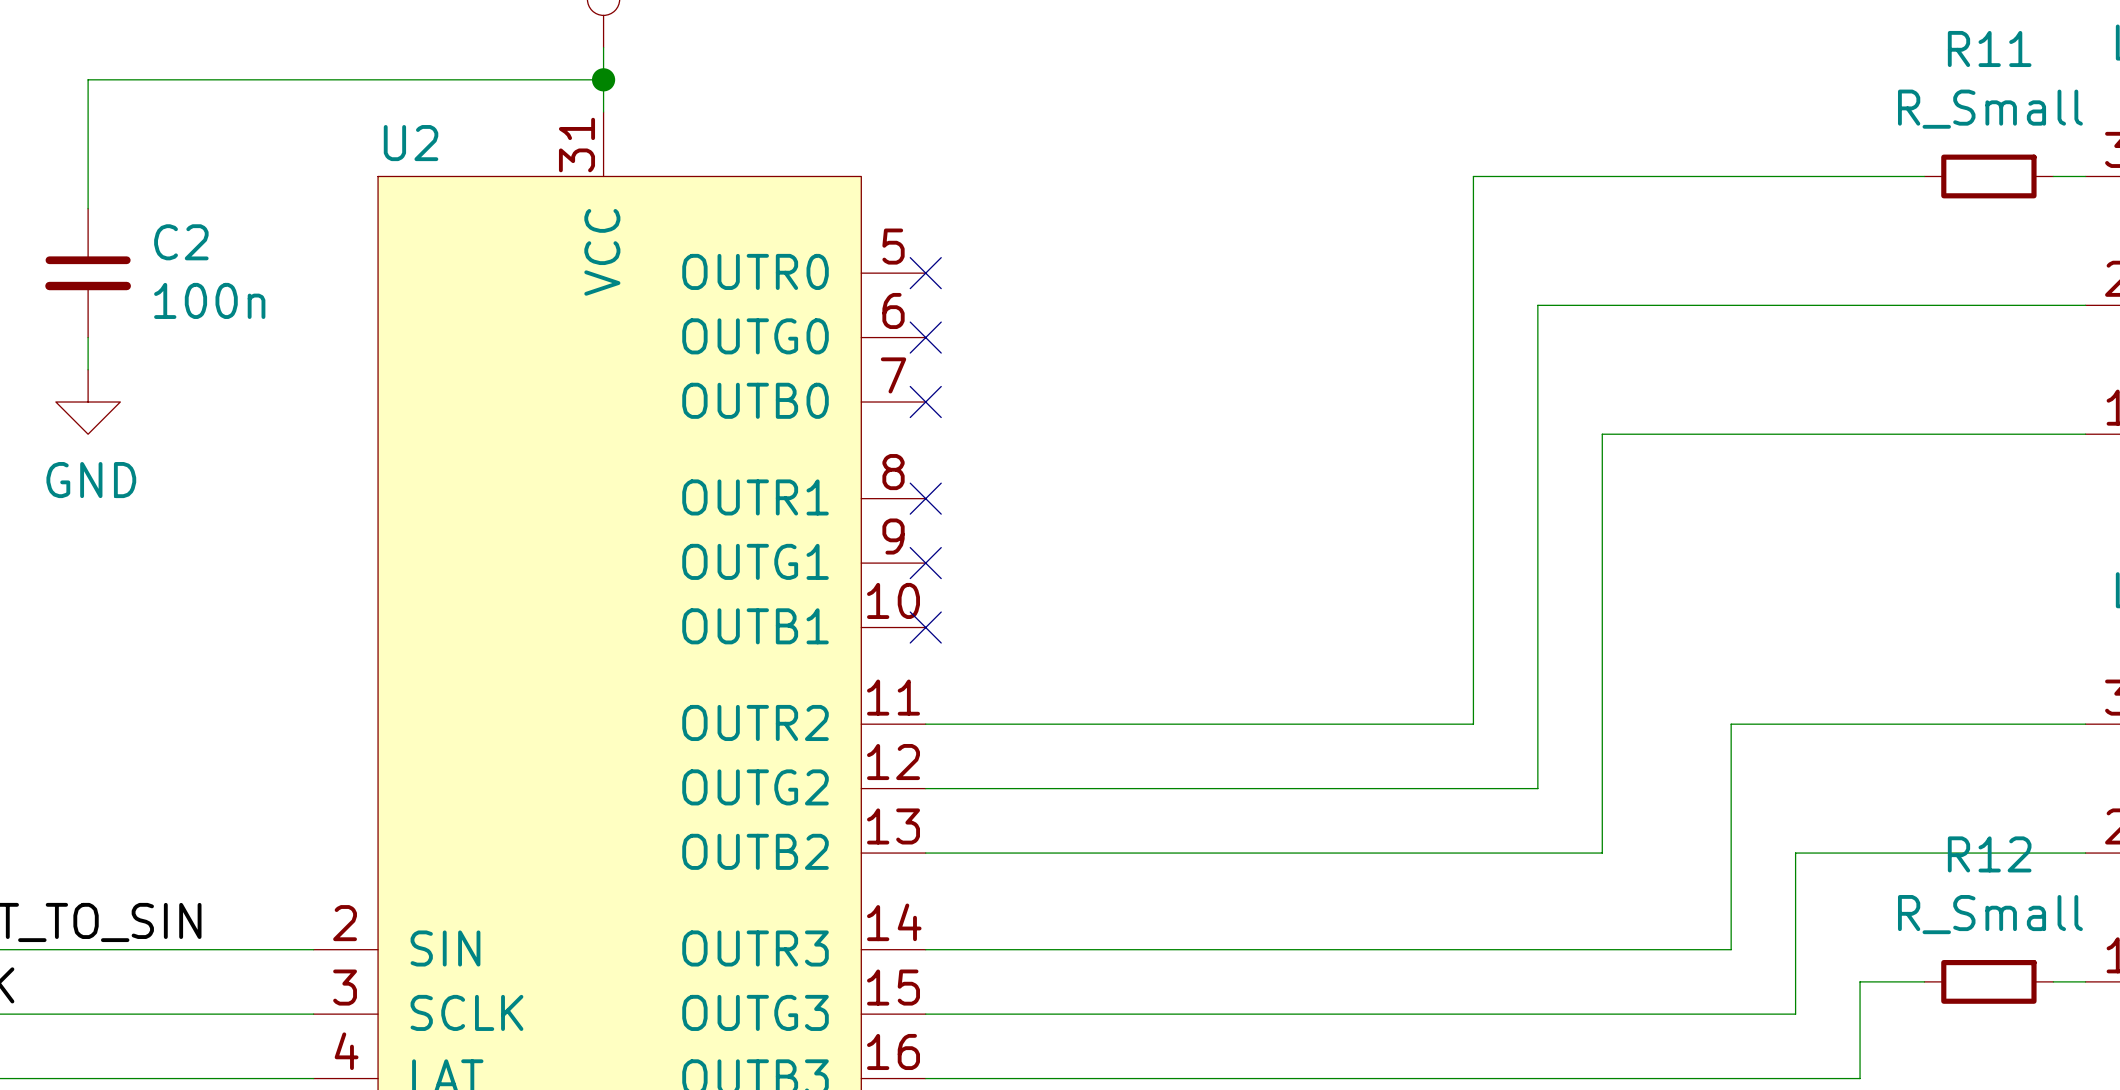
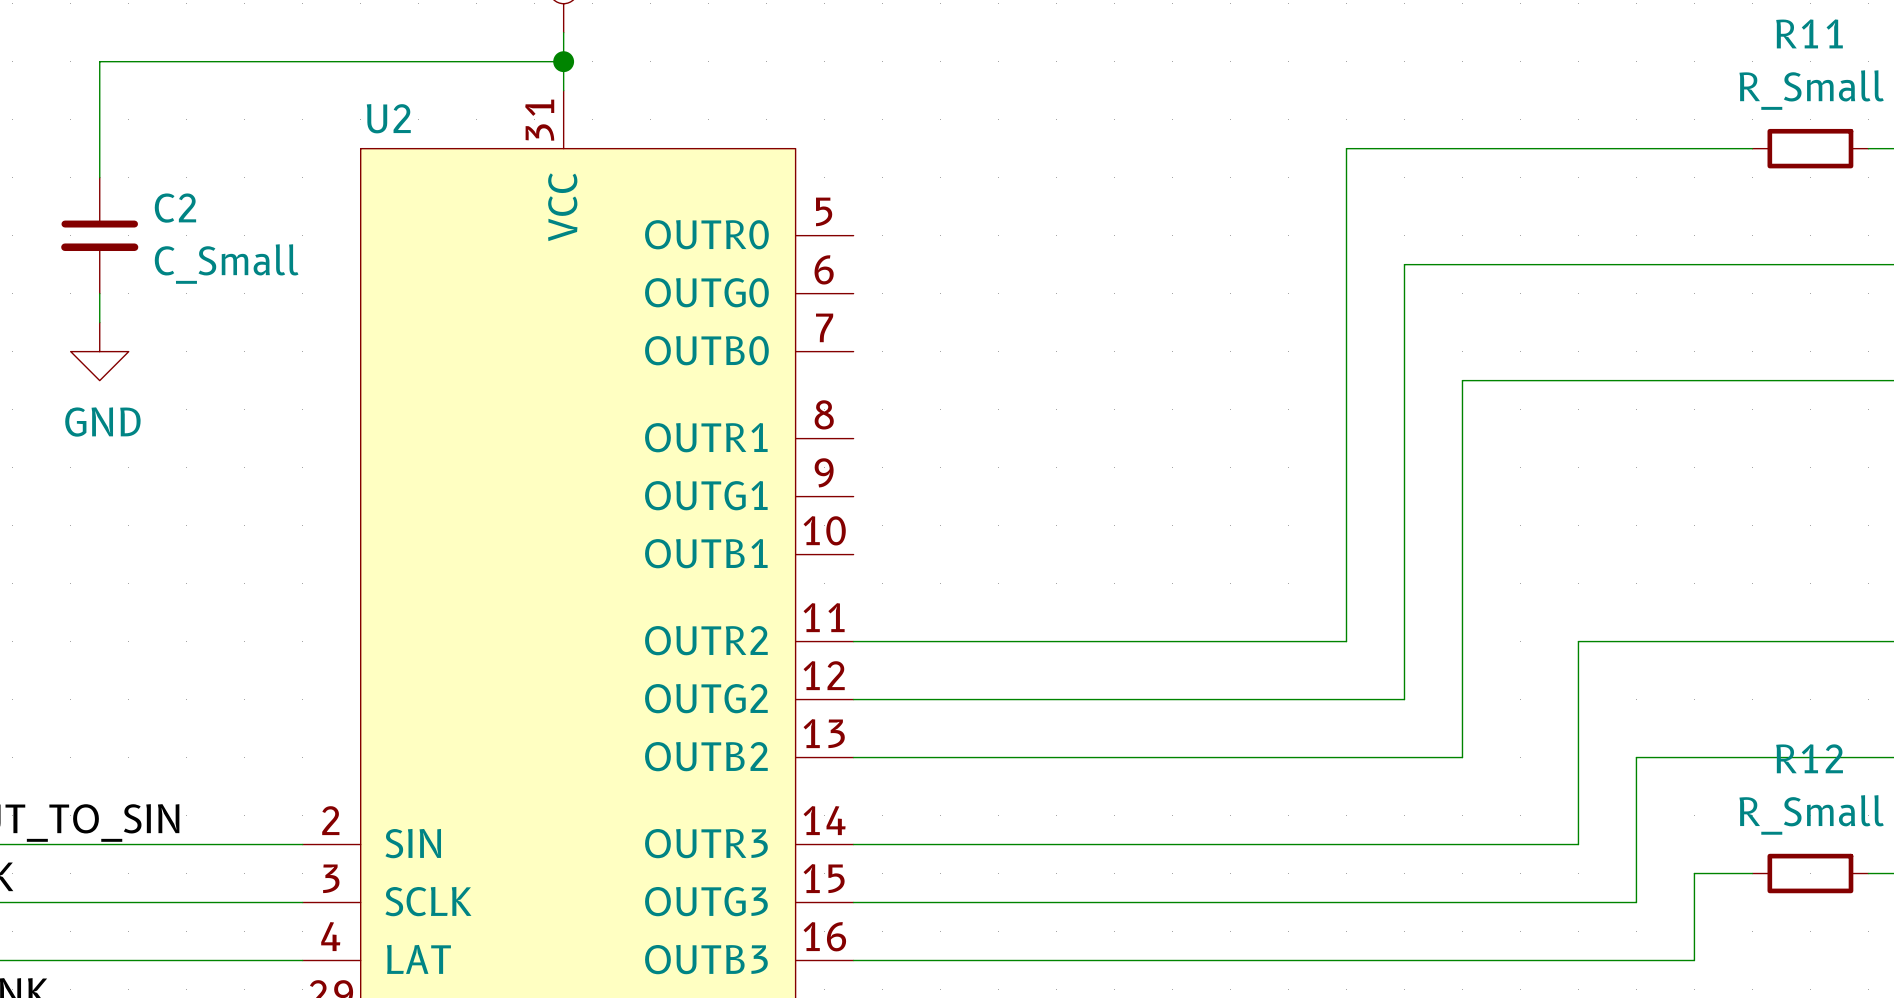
no-connect mark: (925, 273) -> none
C2 value: 100n (209, 300) -> C_Small (226, 264)
no-connect mark: (925, 337) -> none
no-connect mark: (925, 402) -> none
no-connect mark: (925, 498) -> none
no-connect mark: (925, 563) -> none
no-connect mark: (925, 627) -> none

